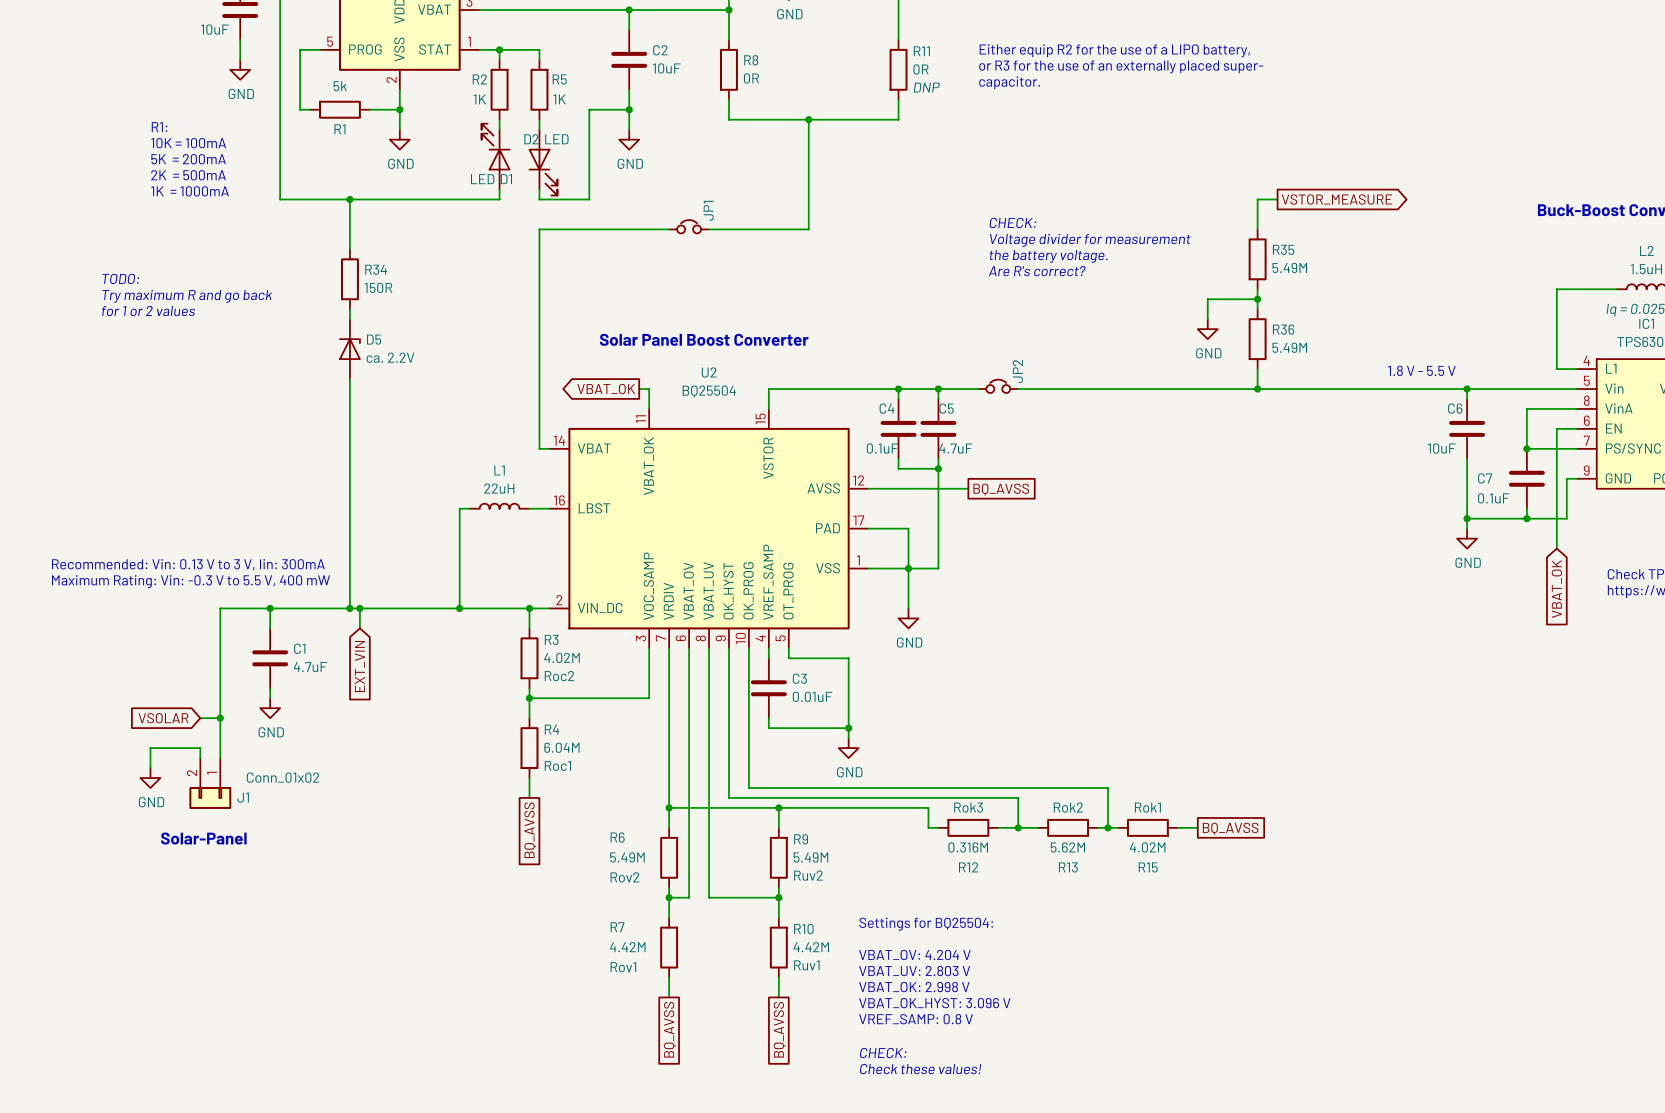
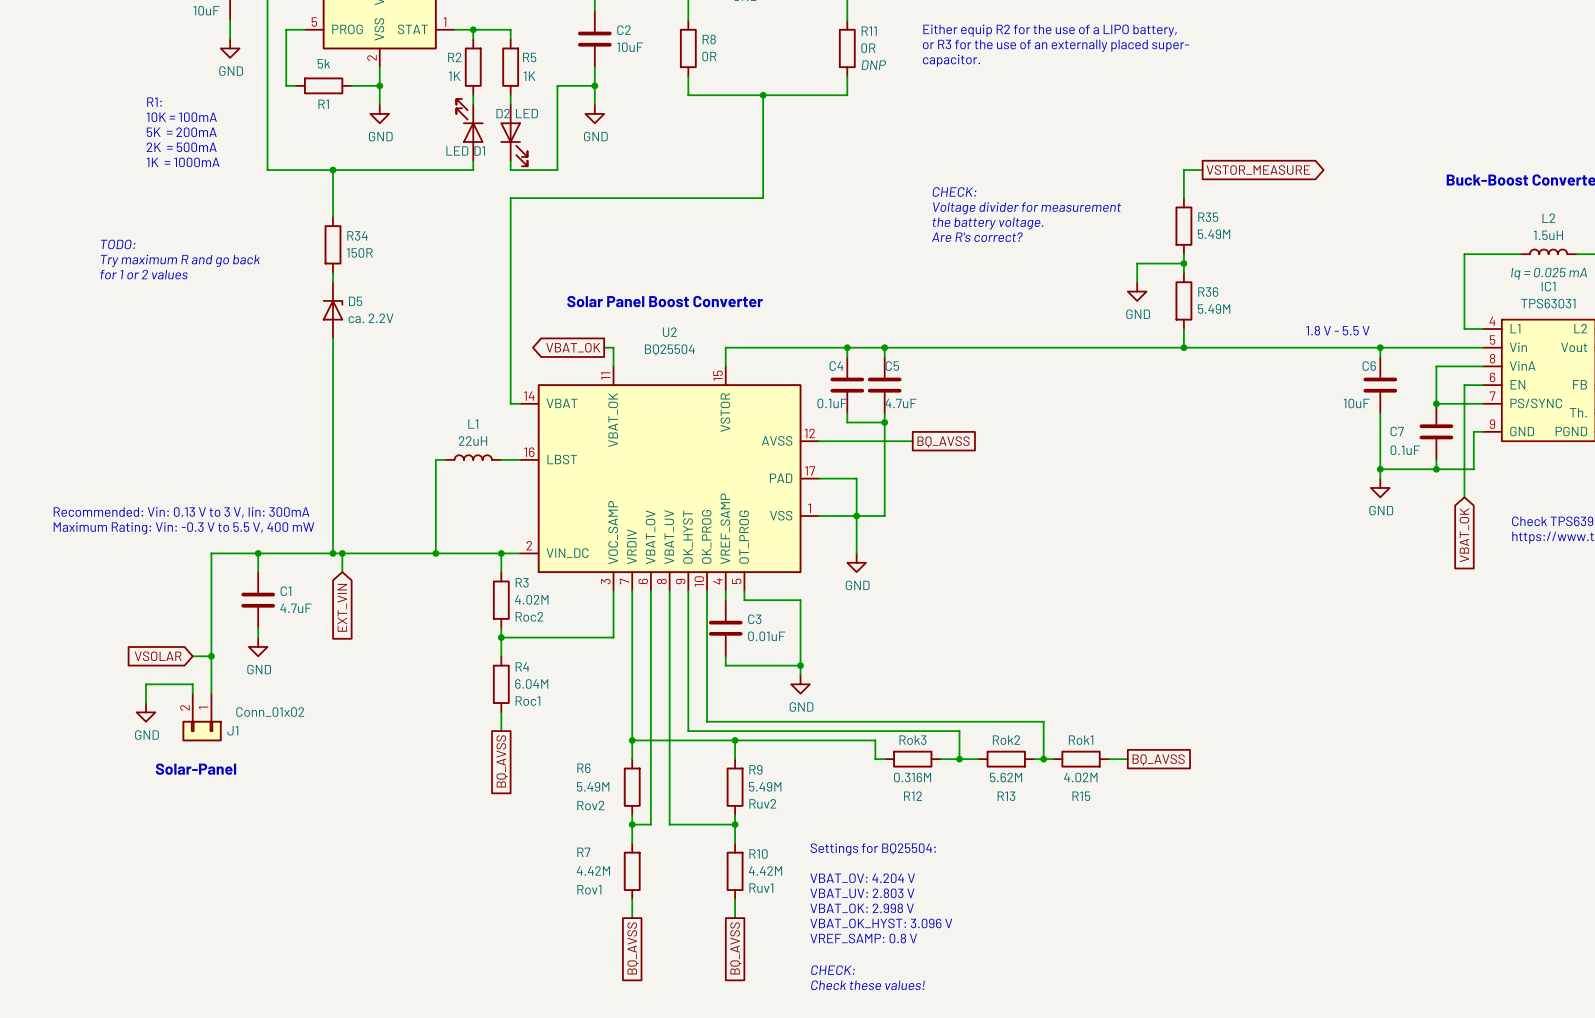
JP1: (689, 226) -> none
JP2: (998, 386) -> none

